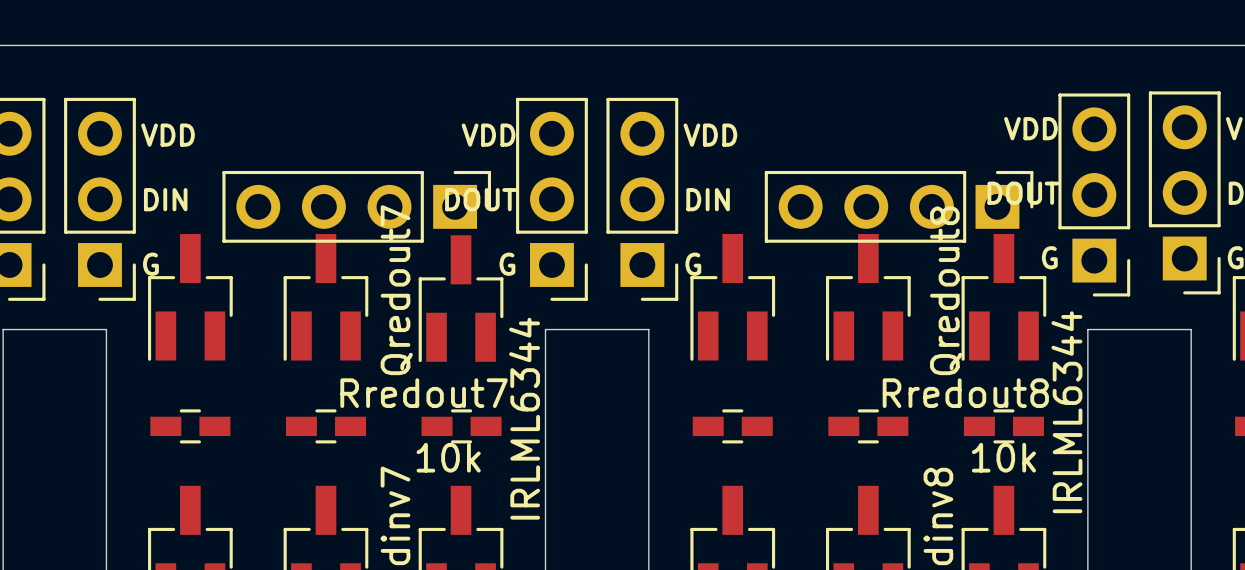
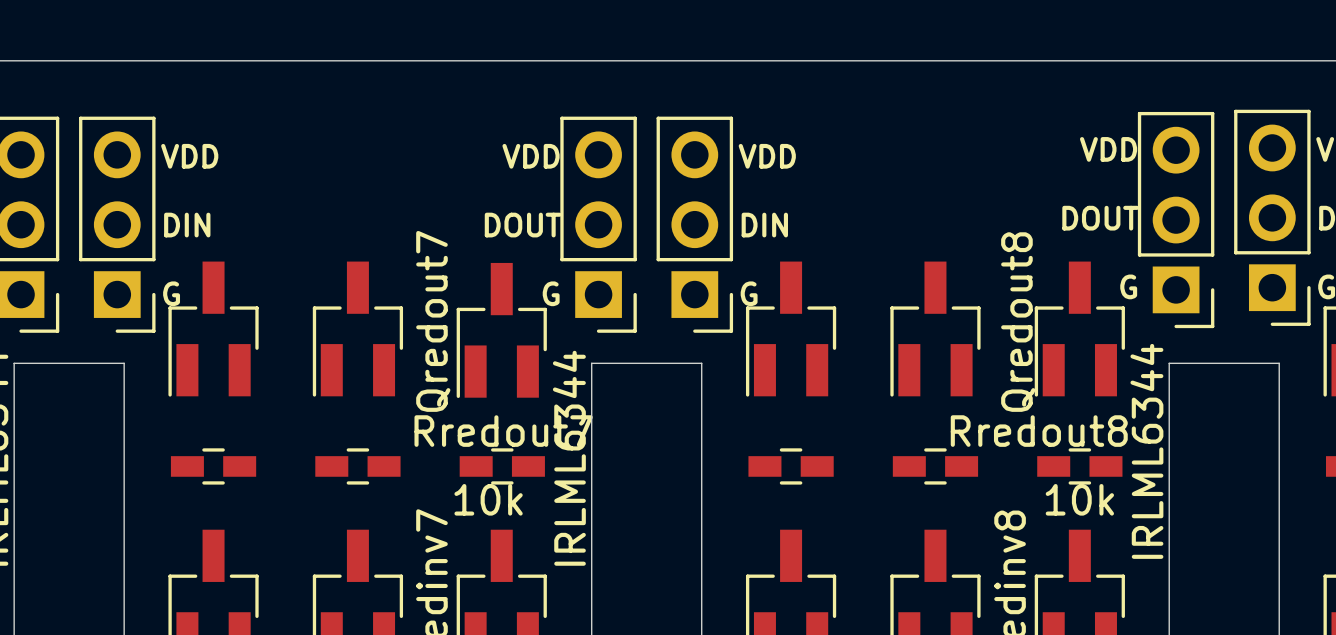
part: (356, 206) -> none
part: (899, 206) -> none
Rredout7 name position: Rredout7 (424, 393) -> Rredout7 (503, 431)

